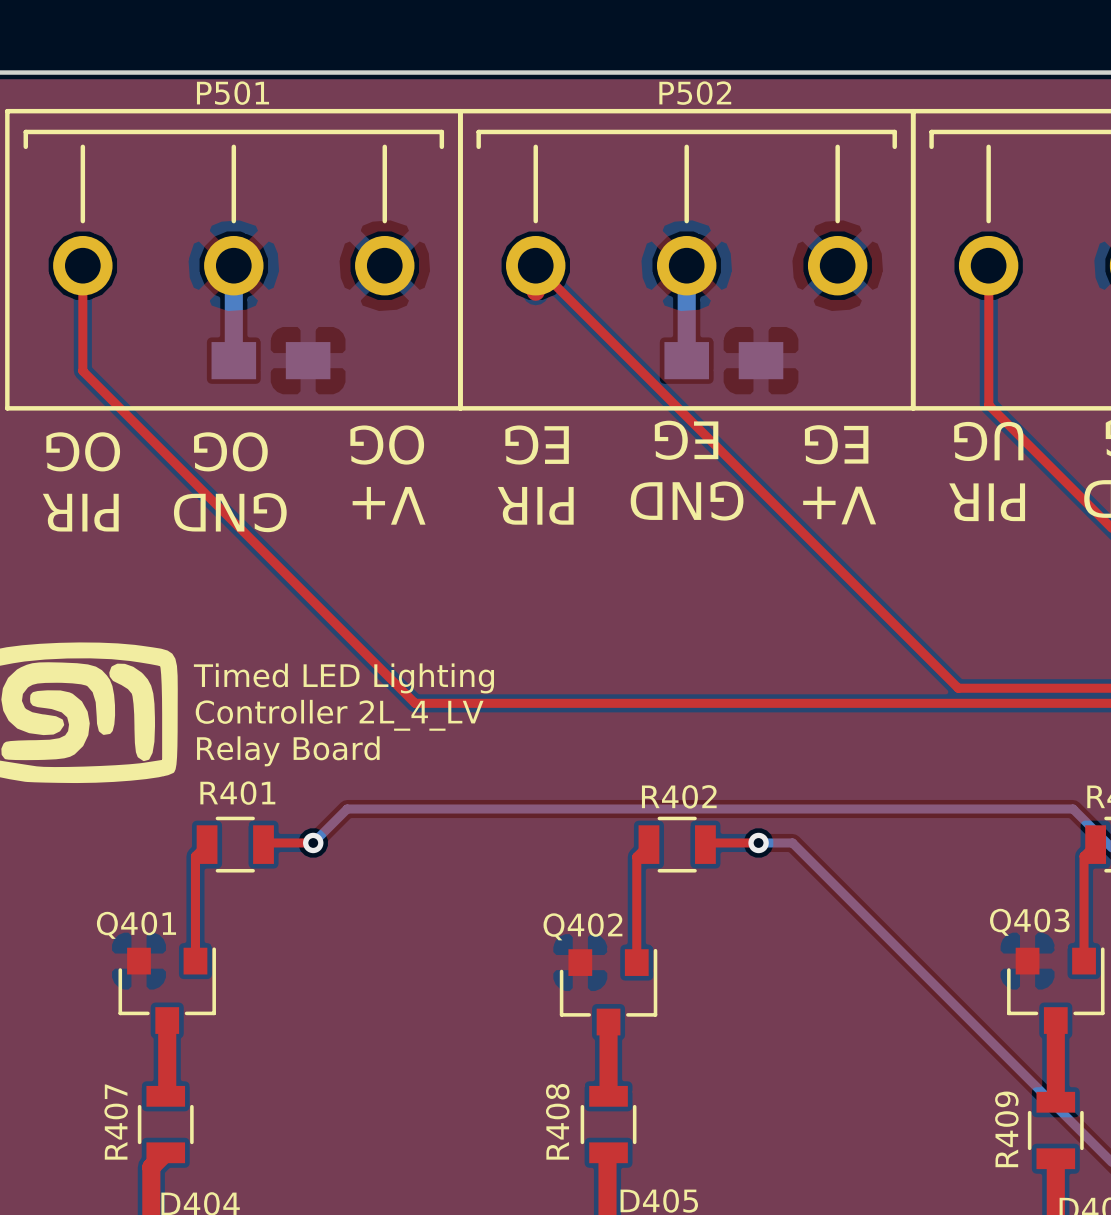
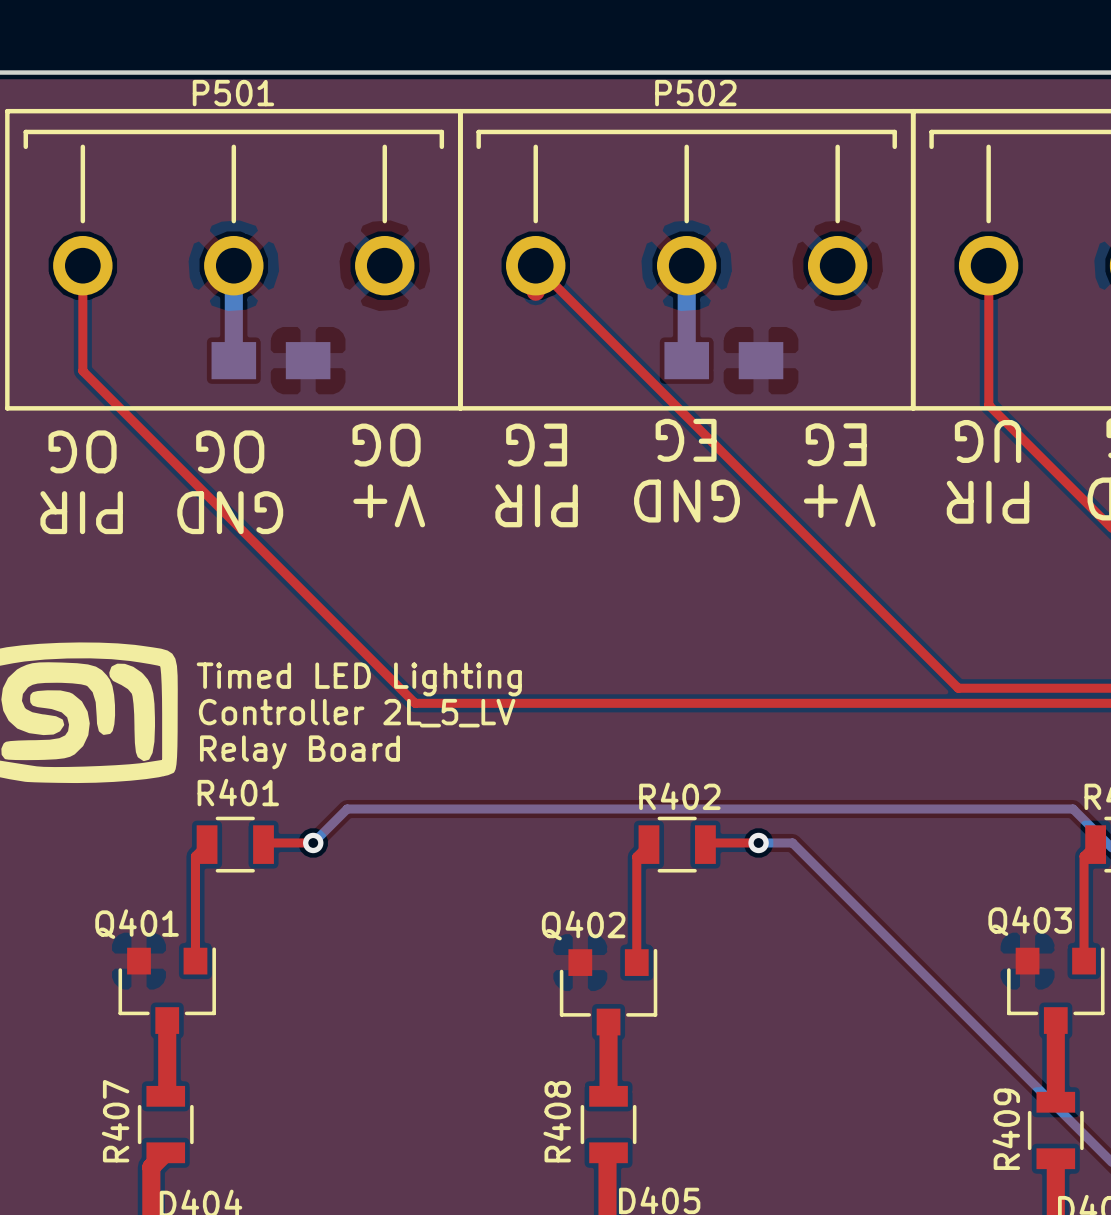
text: Controller 2L_4_LV (339, 715) -> Controller 2L_5_LV (357, 713)

